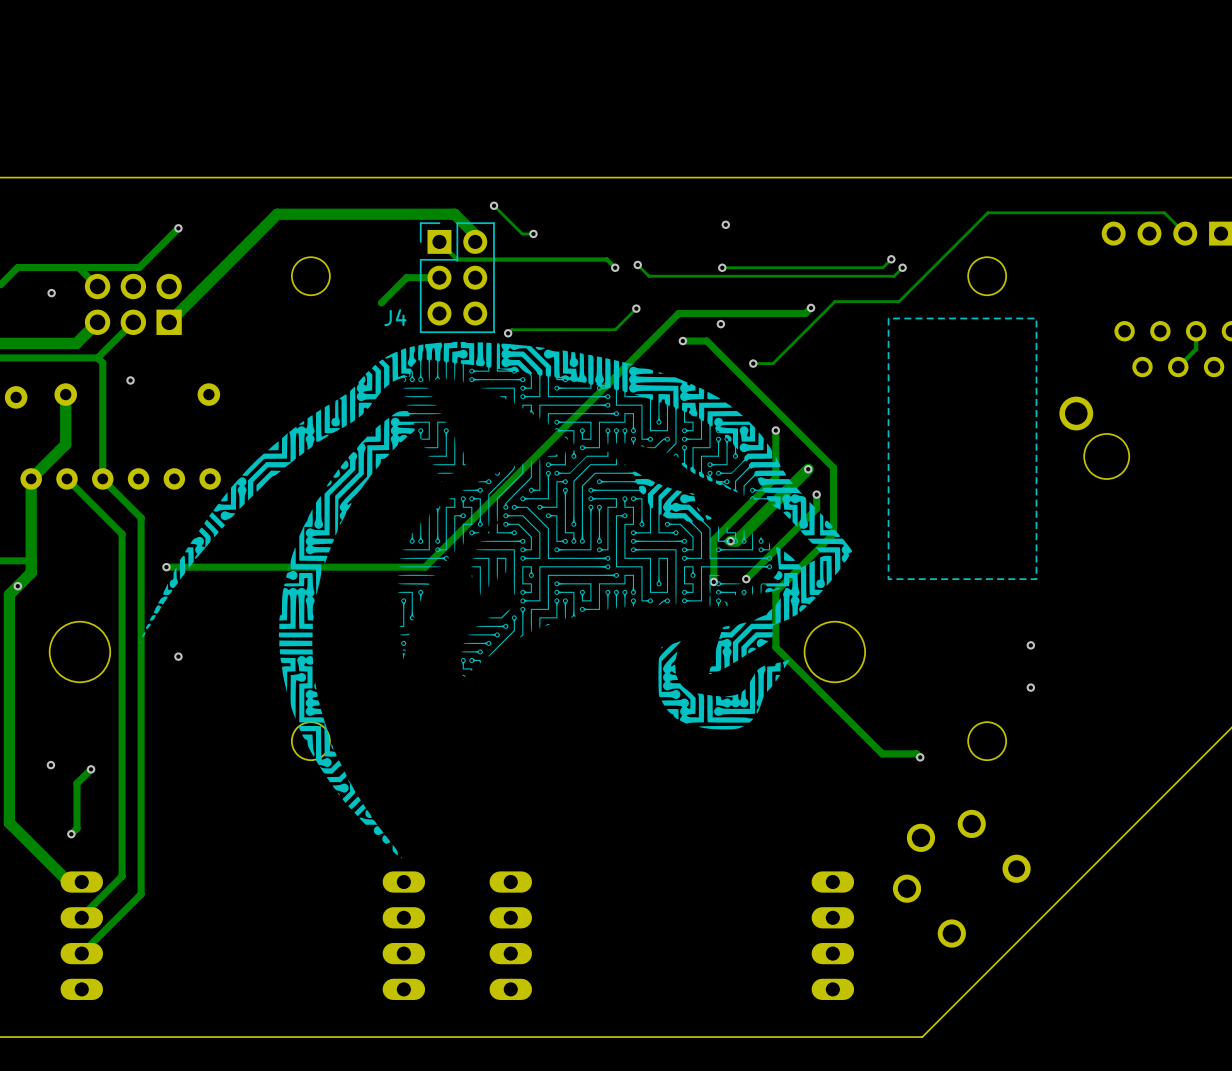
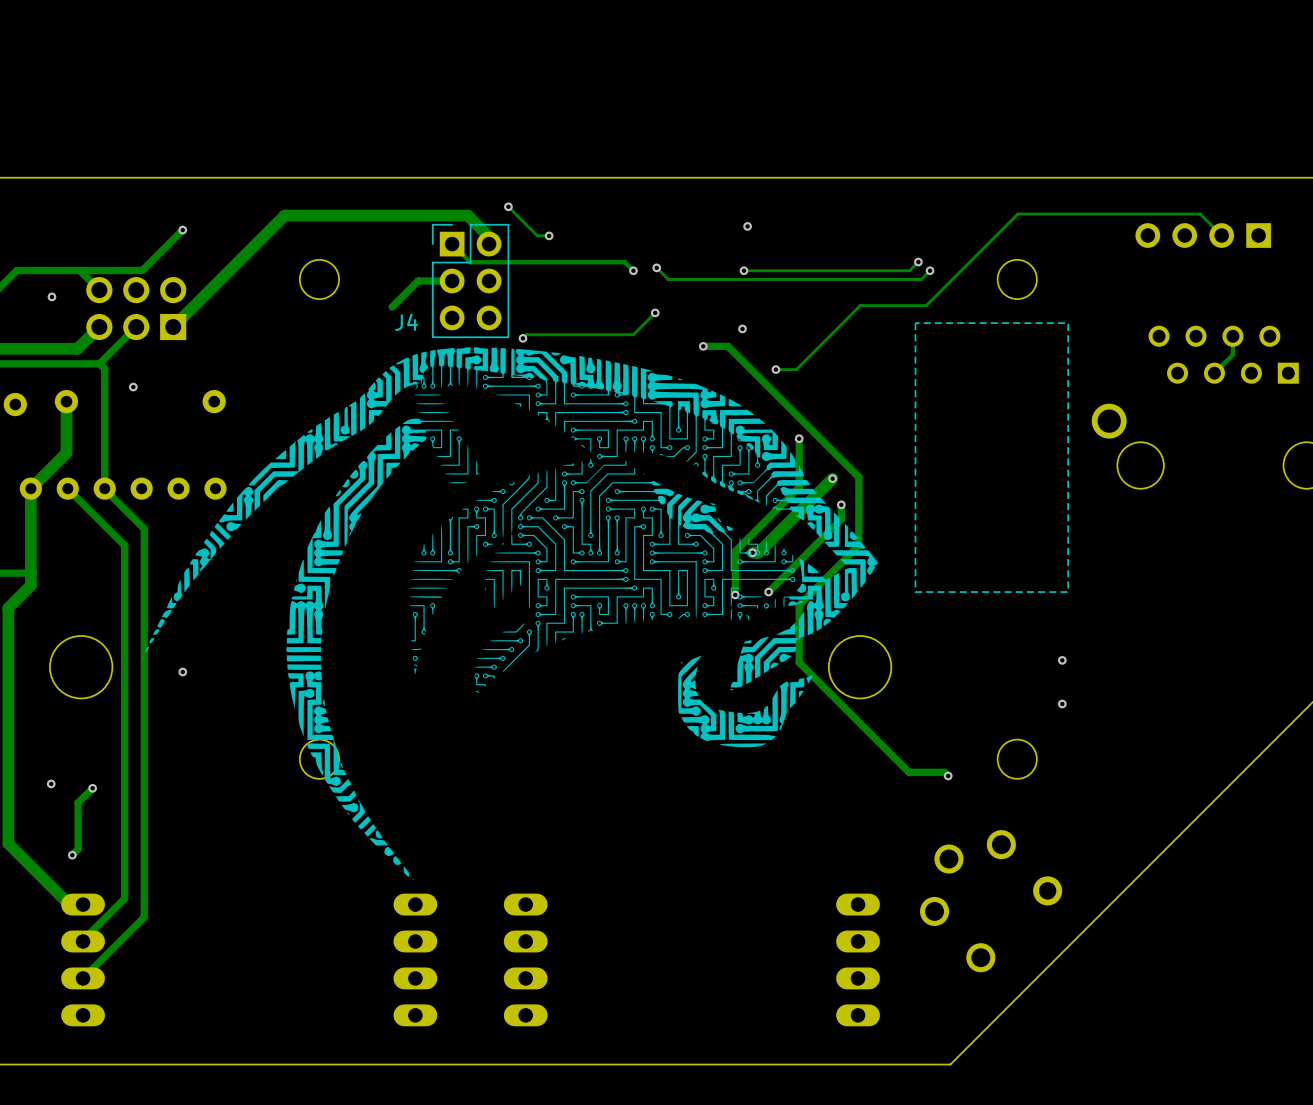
track: (811, 307) (805, 313) (678, 313) (425, 567) (166, 567) -> none
via: (811, 307) -> none
via: (166, 567) -> none
via: (17, 586) -> none

